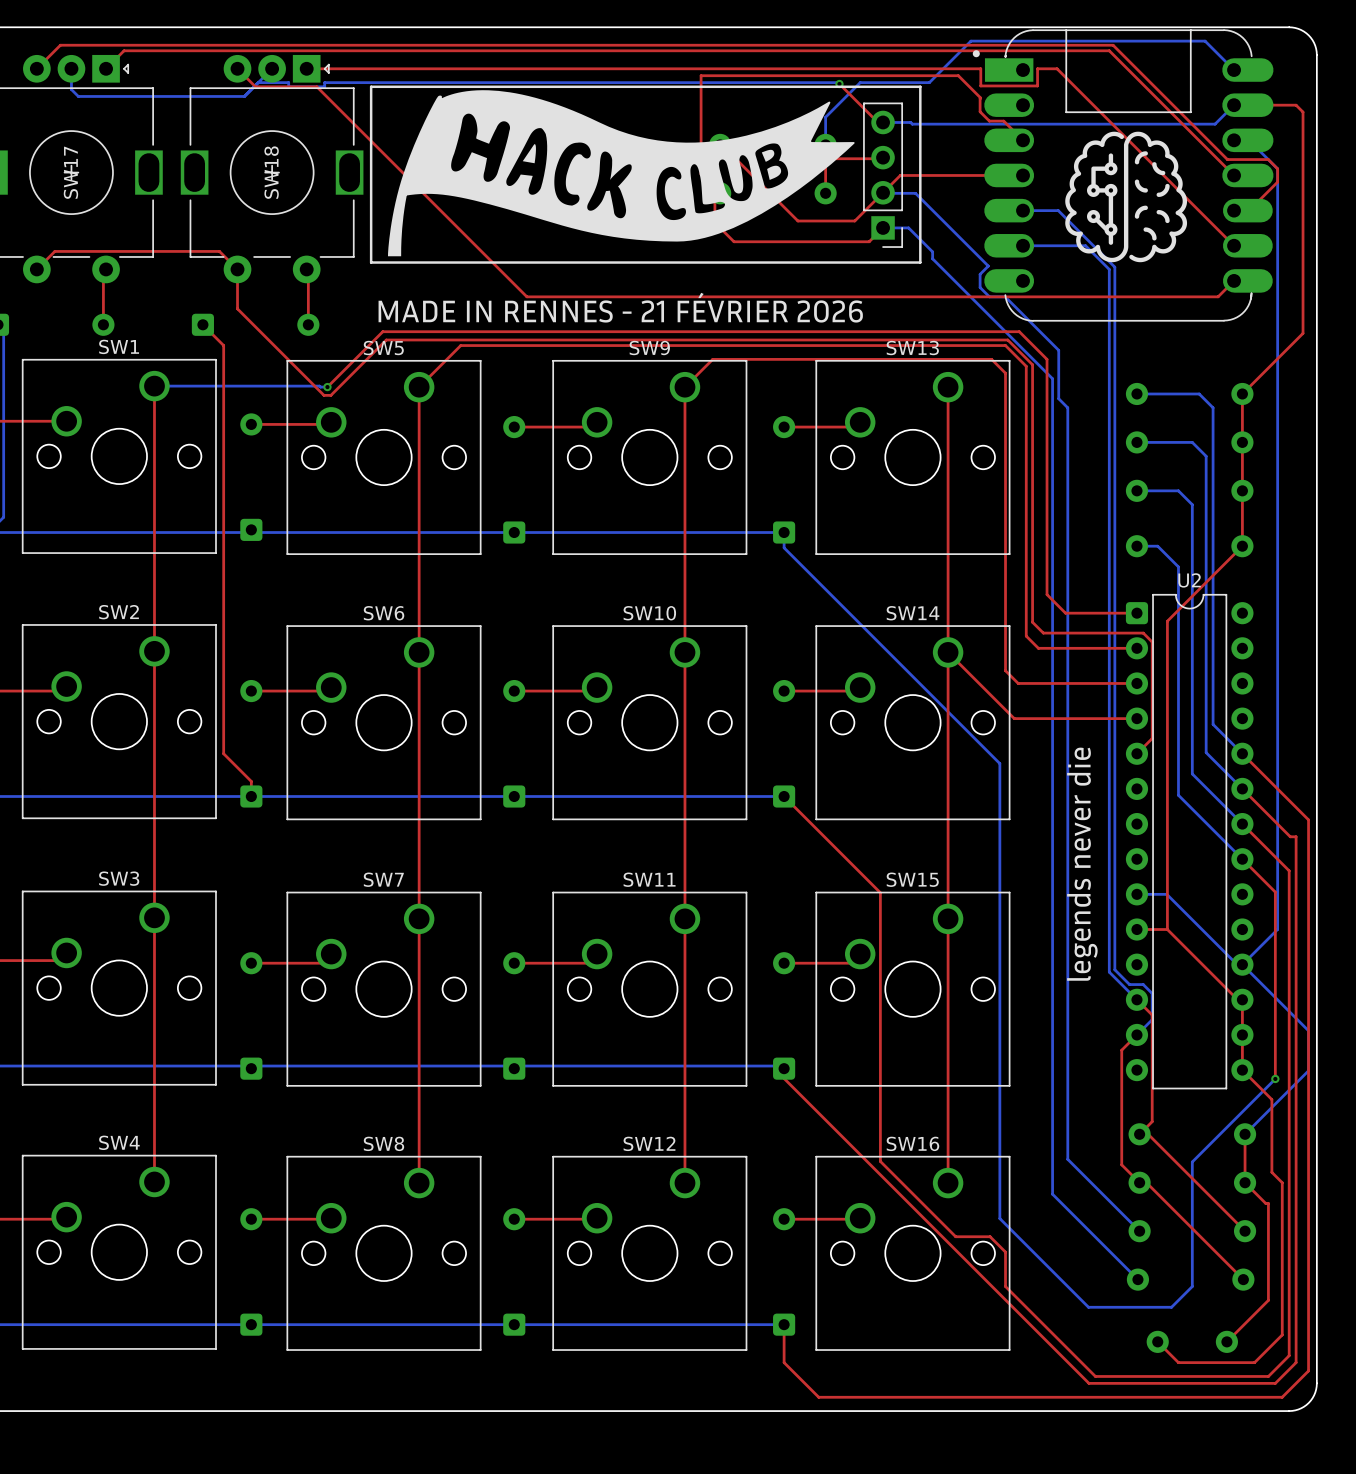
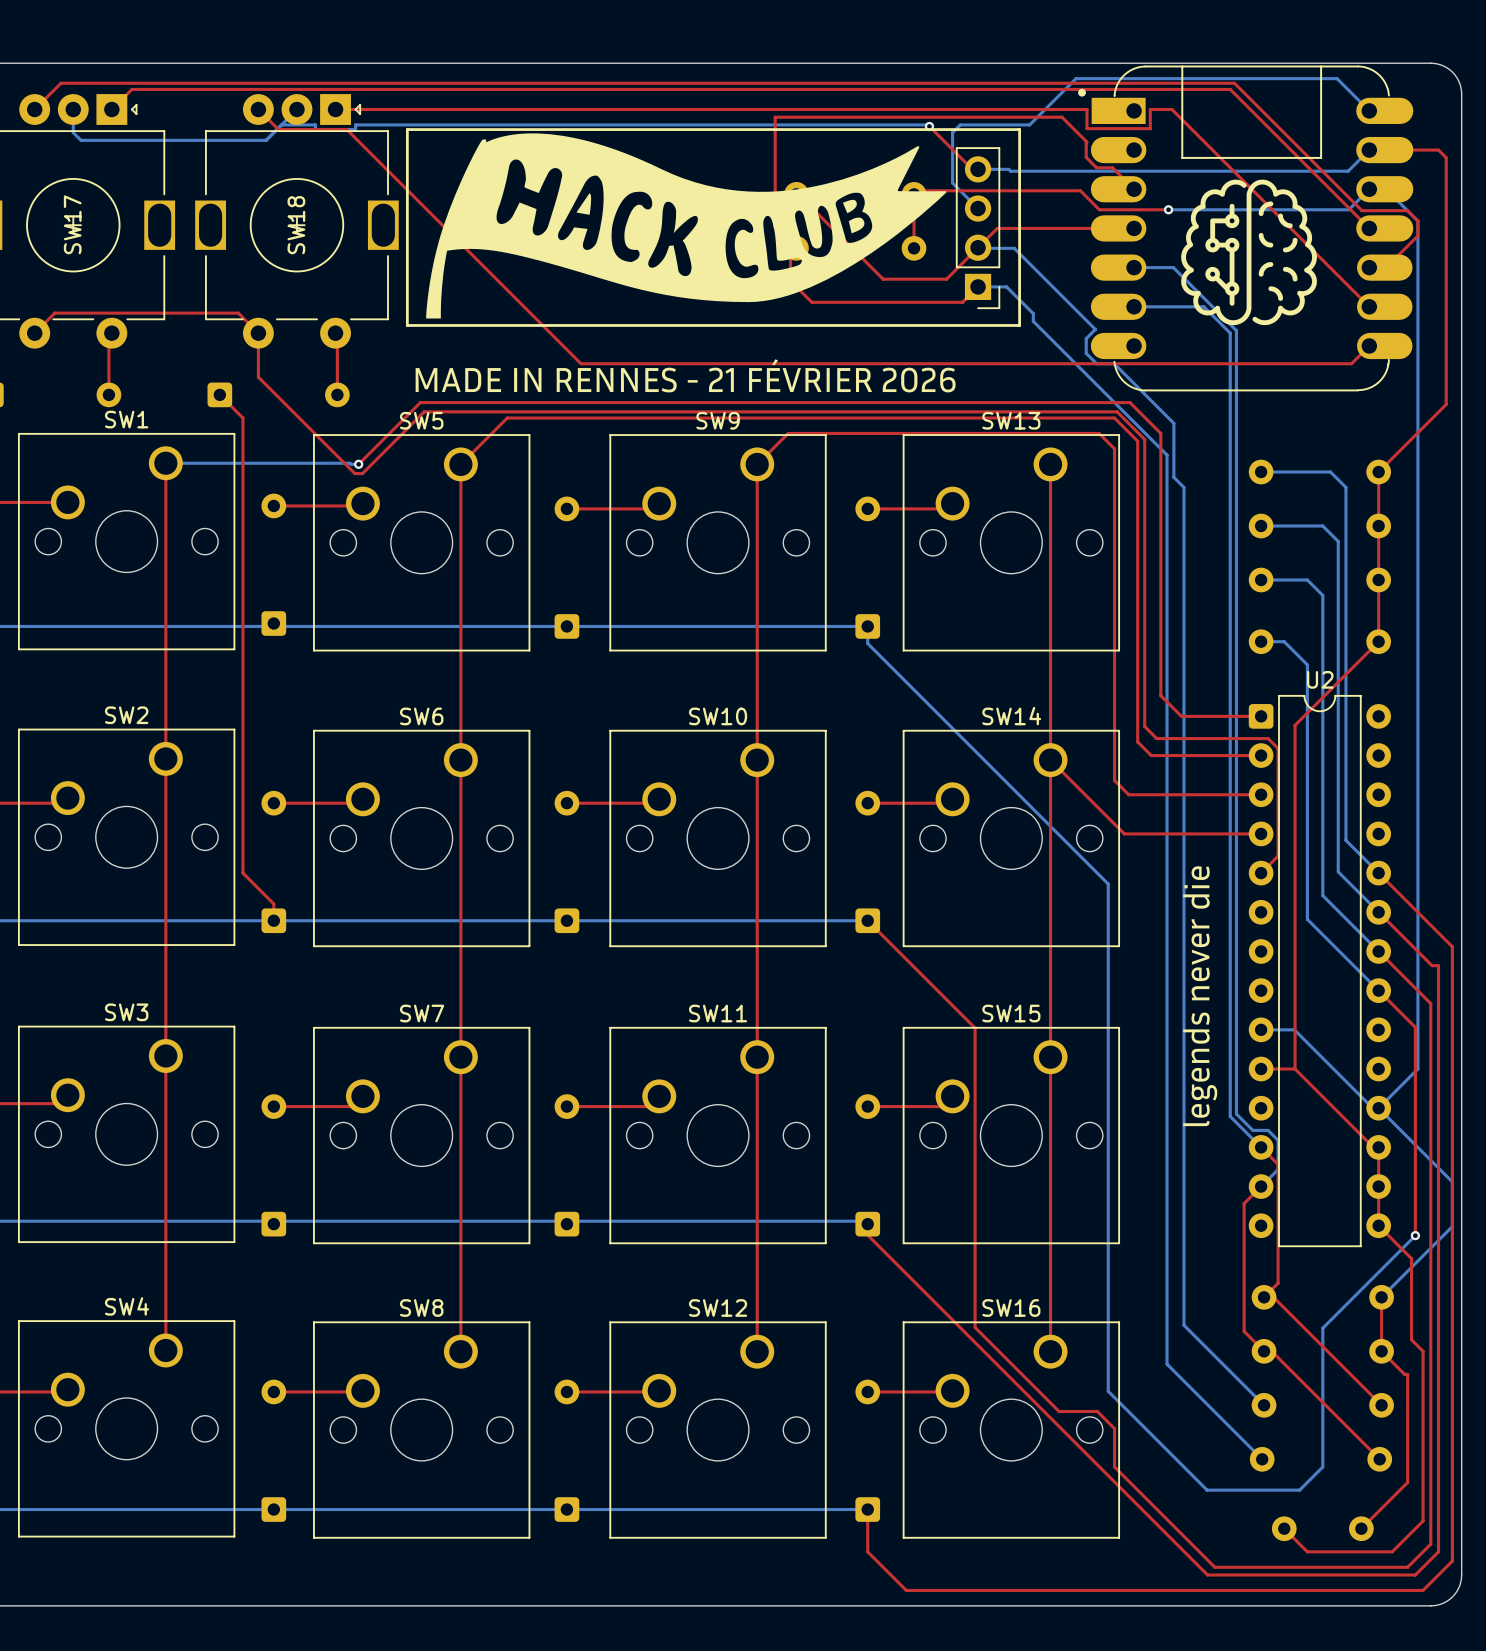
bottom track: (867, 82) (860, 82) (825, 117) (825, 144) -> (960, 124) (952, 132) (952, 183) (978, 208)
bottom track: none -> (1369, 189) (1348, 209) (1168, 209)
top track: none -> (914, 194) (917, 190) (1080, 190) (1099, 209) (1168, 209)
top track: (883, 158) (832, 158) (825, 165) -> none
via: none -> (1168, 209)

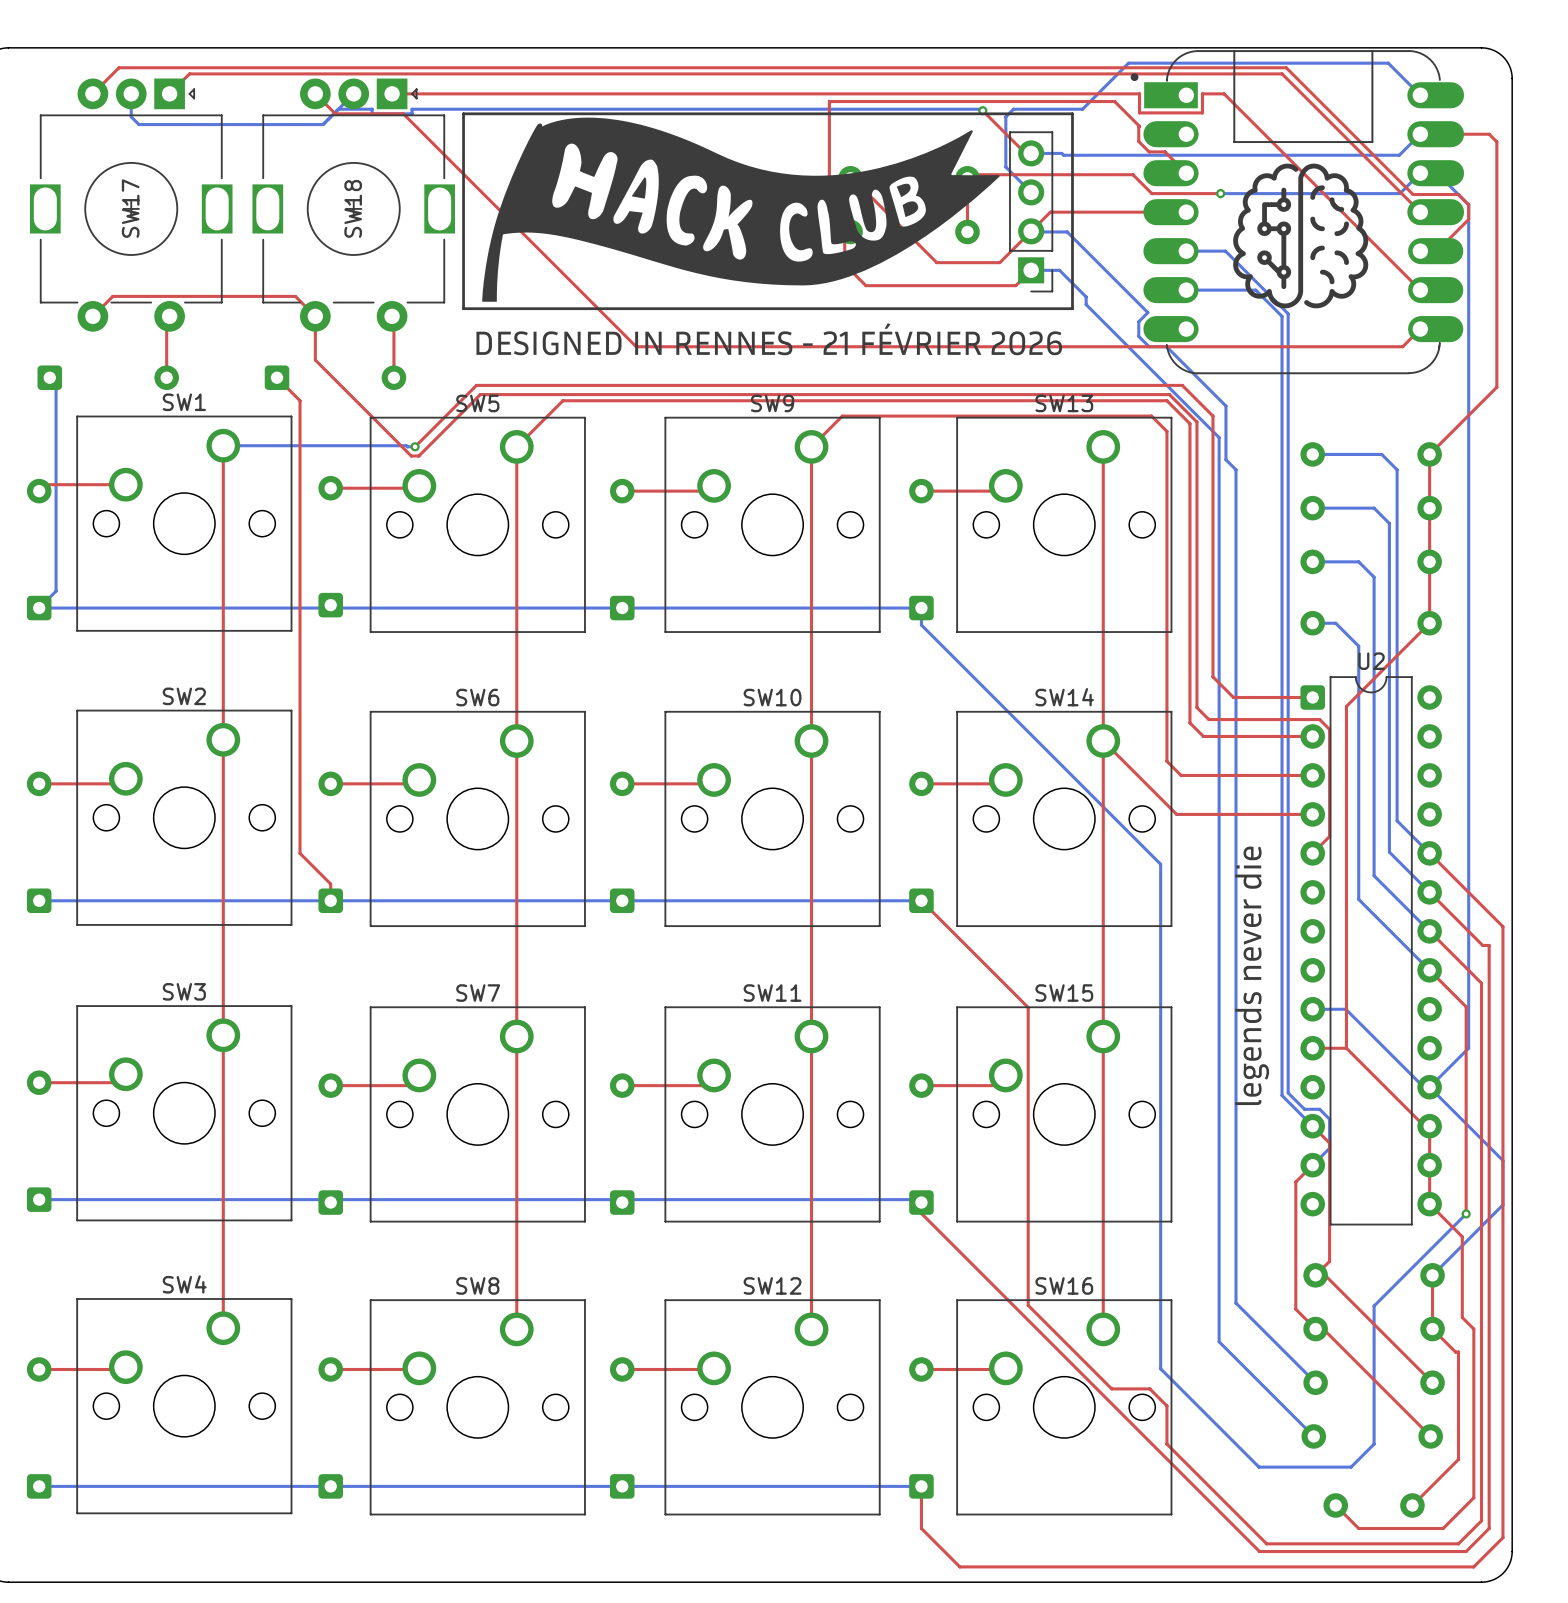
drawing: none -> [823, 323, 1063, 356]
drawing: none -> [476, 331, 793, 356]
drawing: [415, 367, 677, 393] -> none
drawing: [708, 367, 956, 393] -> none
drawing position: (692, 381) -> (807, 344)

